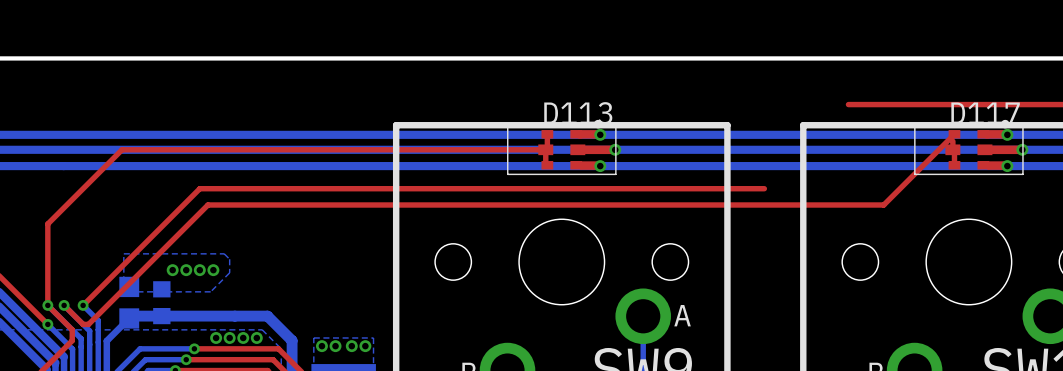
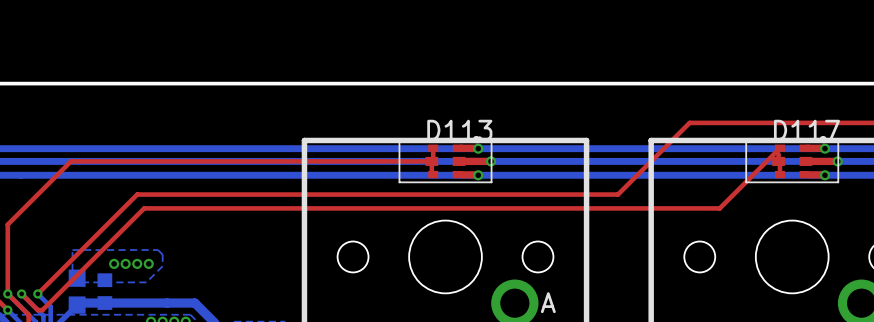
top track: none -> (689, 122) (618, 194)

